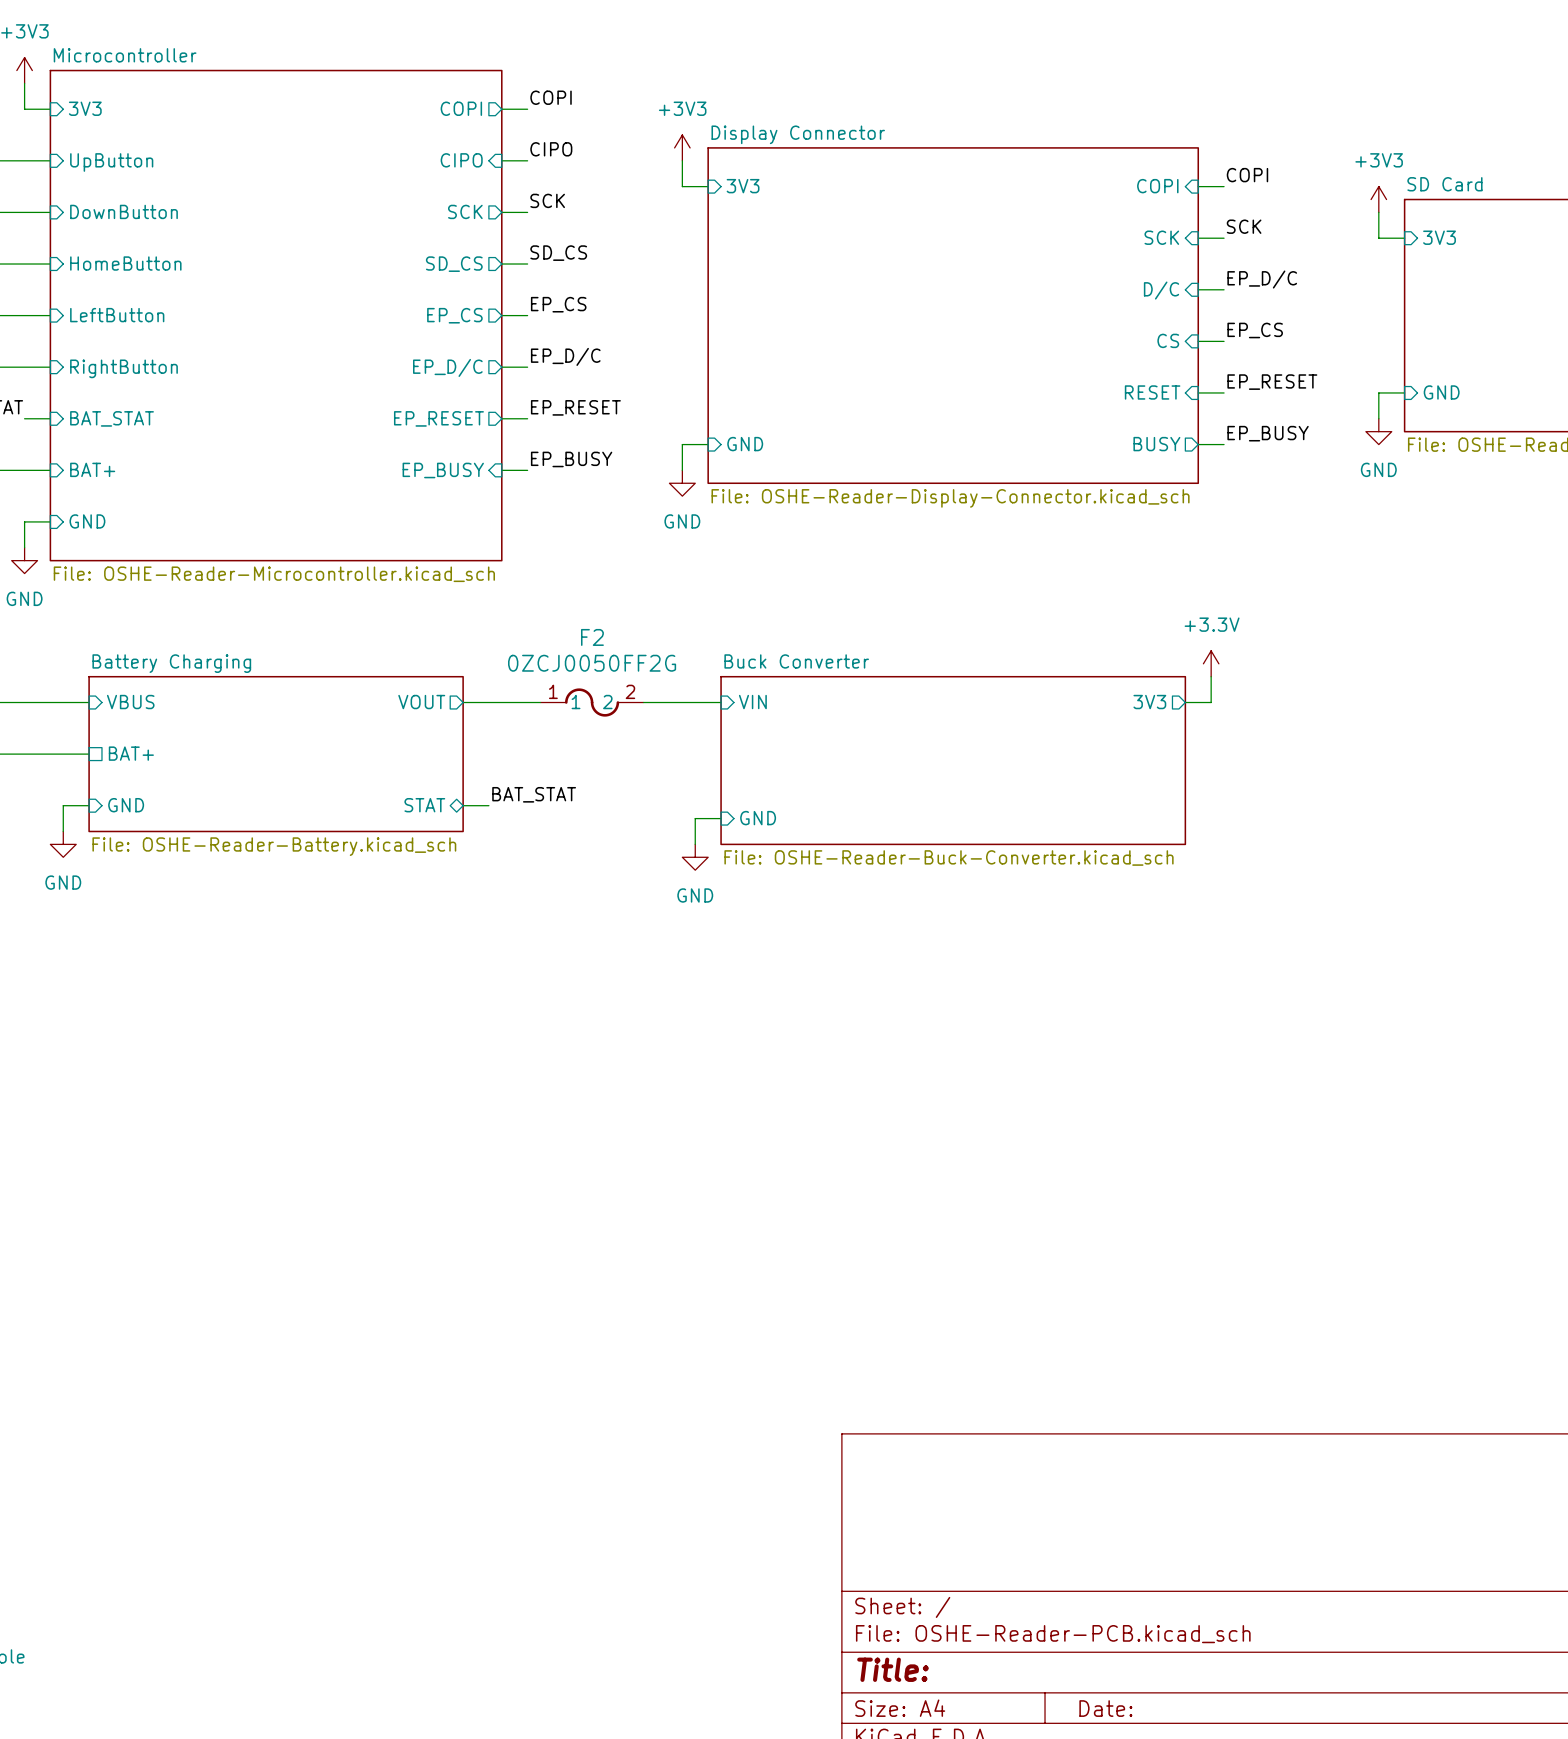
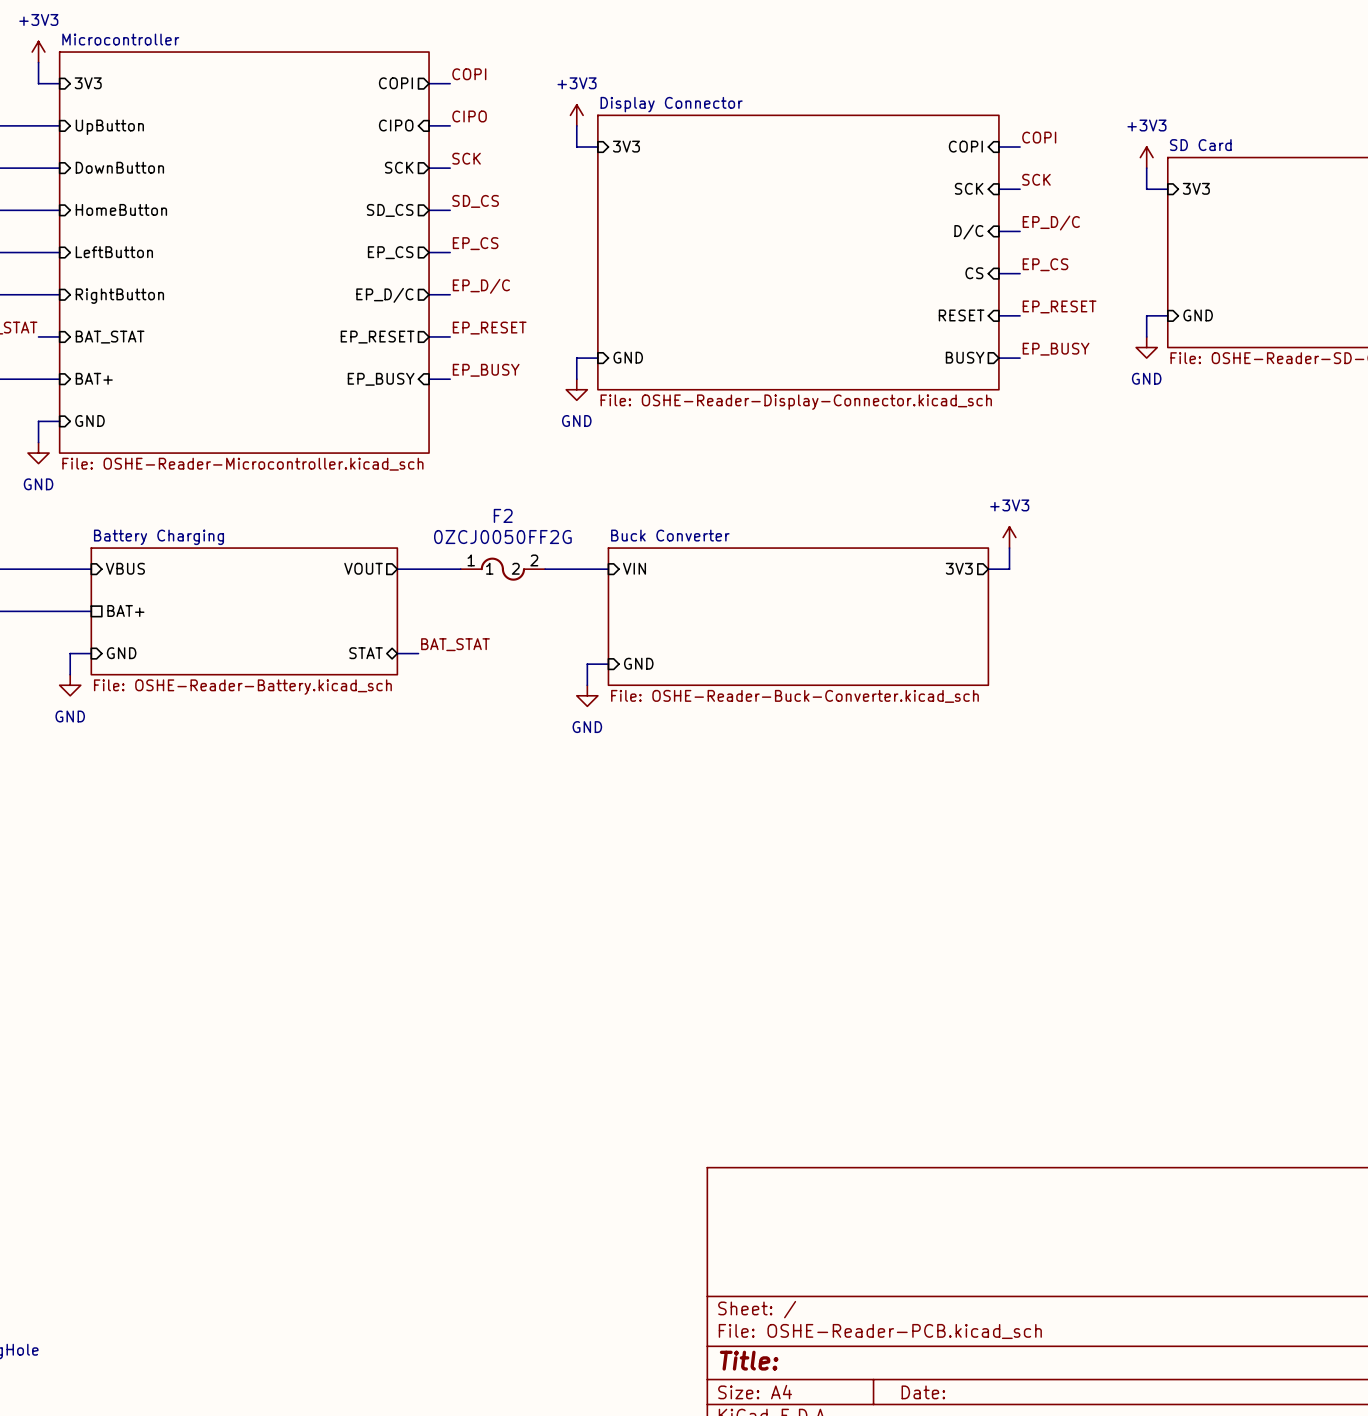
power symbol: +3.3V (1211, 663) -> +3V3 (1009, 537)

